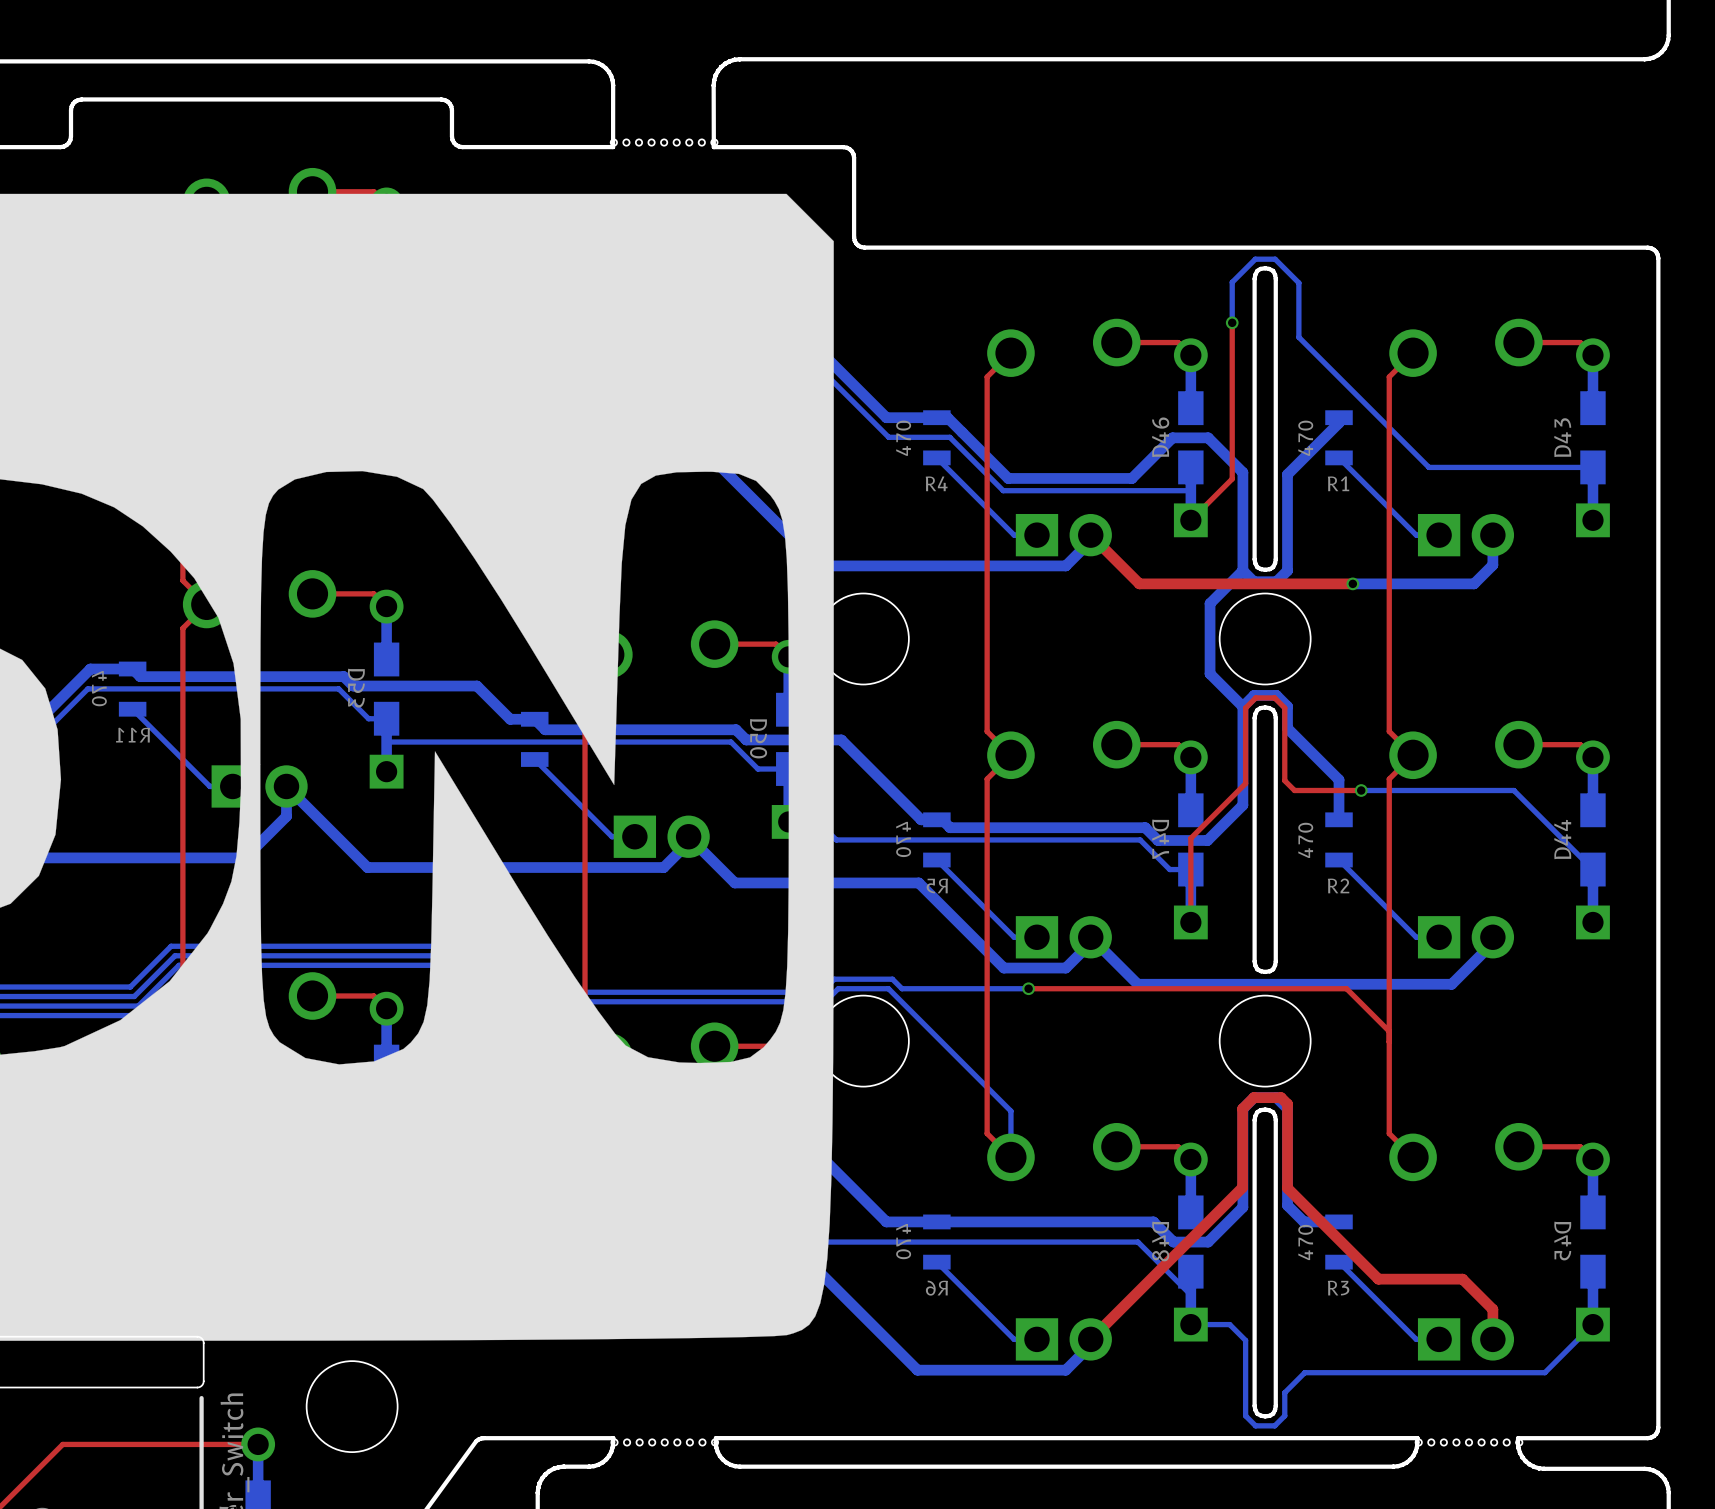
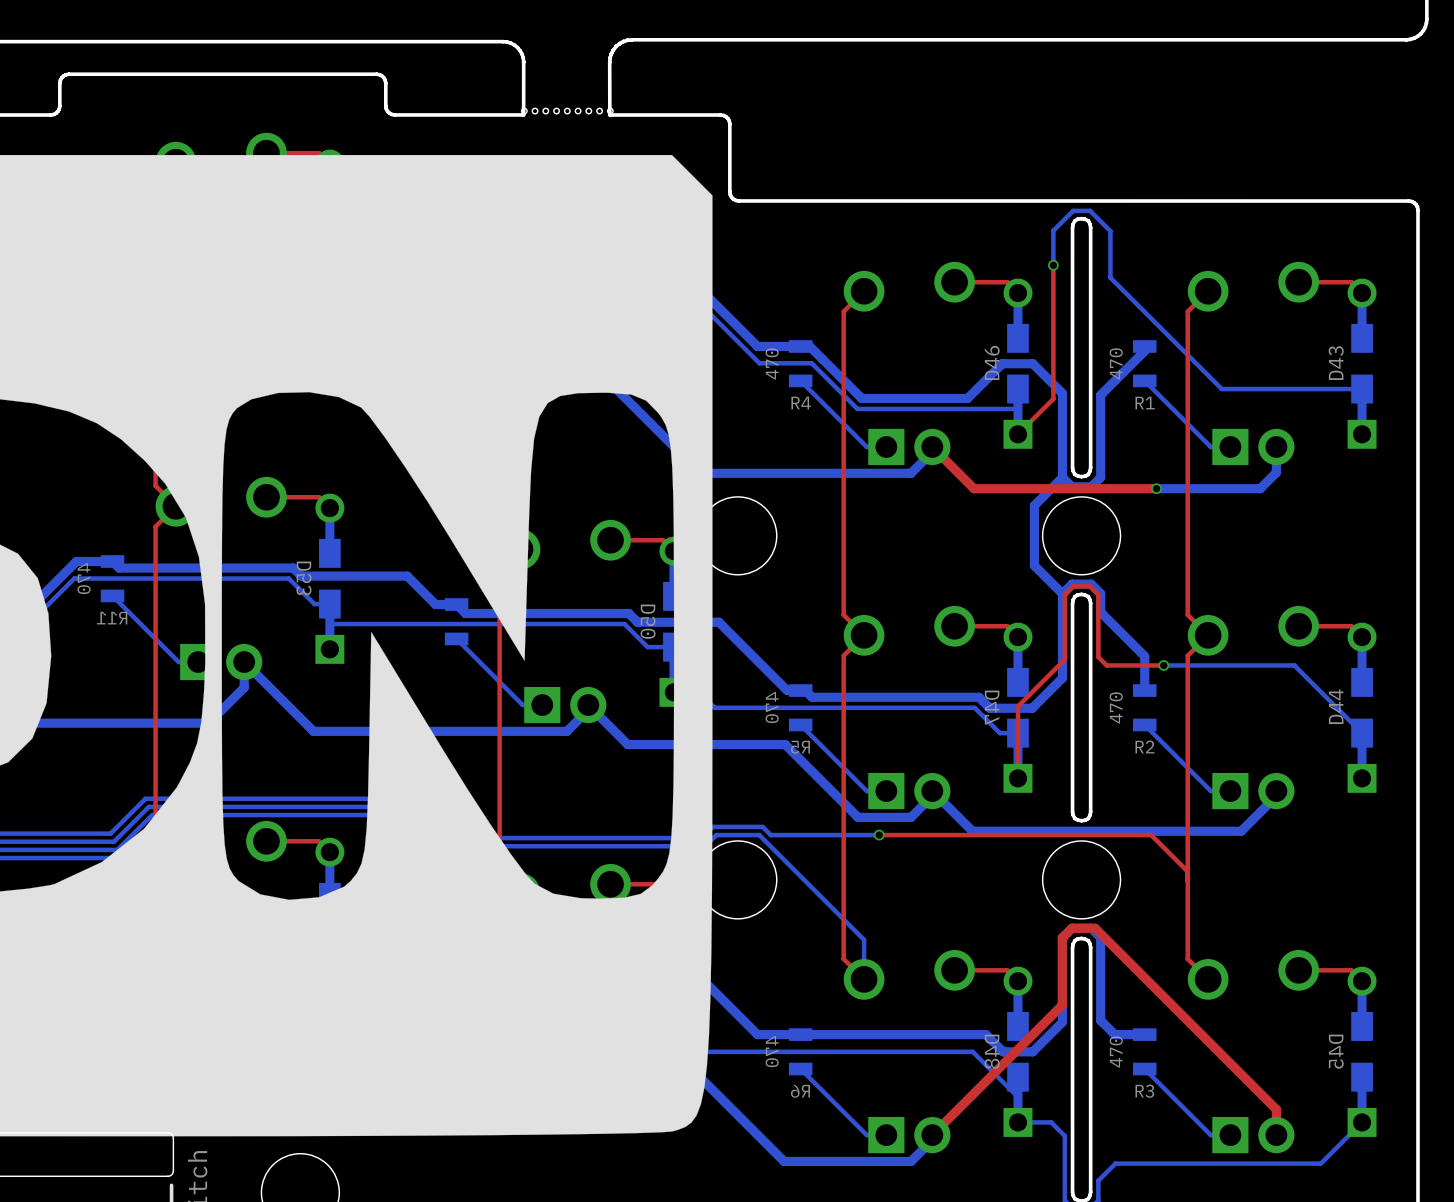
top track: (1287, 1104) (1287, 1188) (1378, 1279) (1462, 1279) -> (1100, 933) (1250, 1083)

